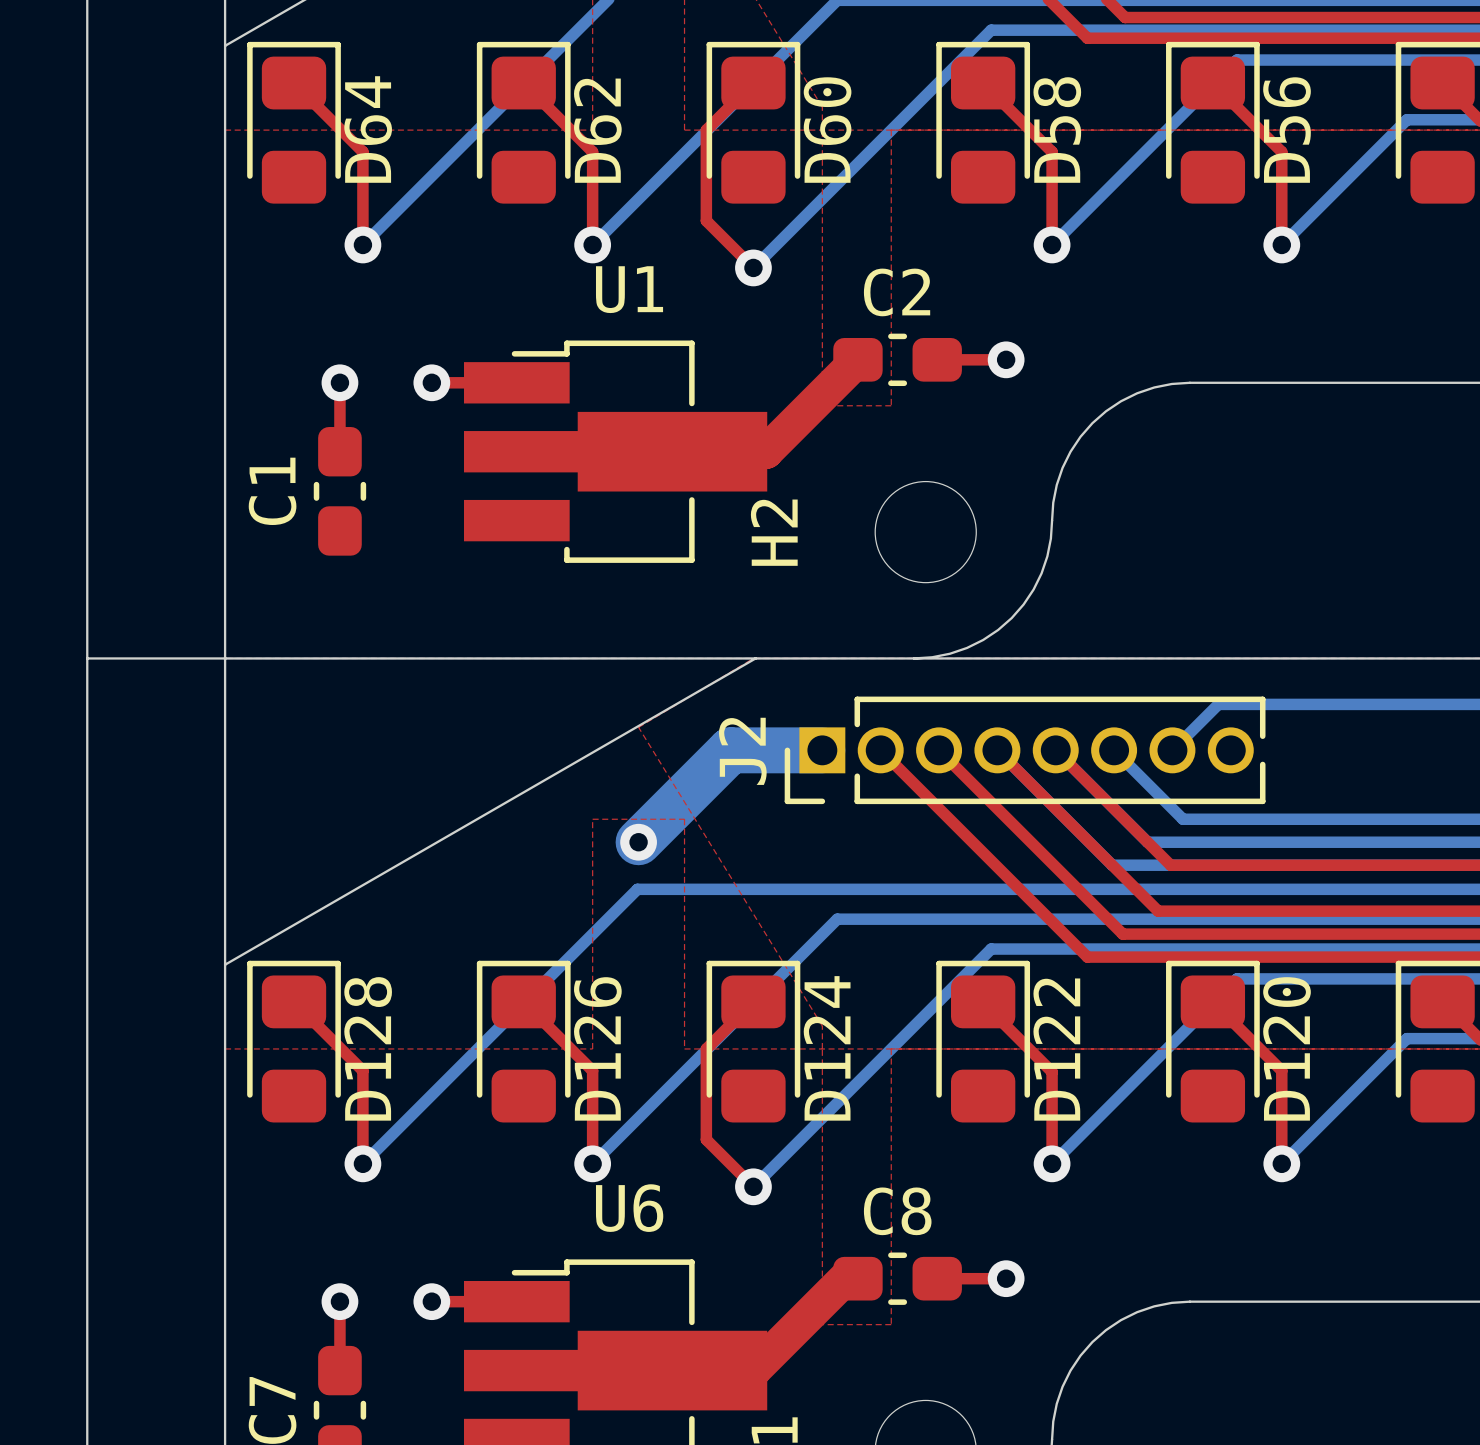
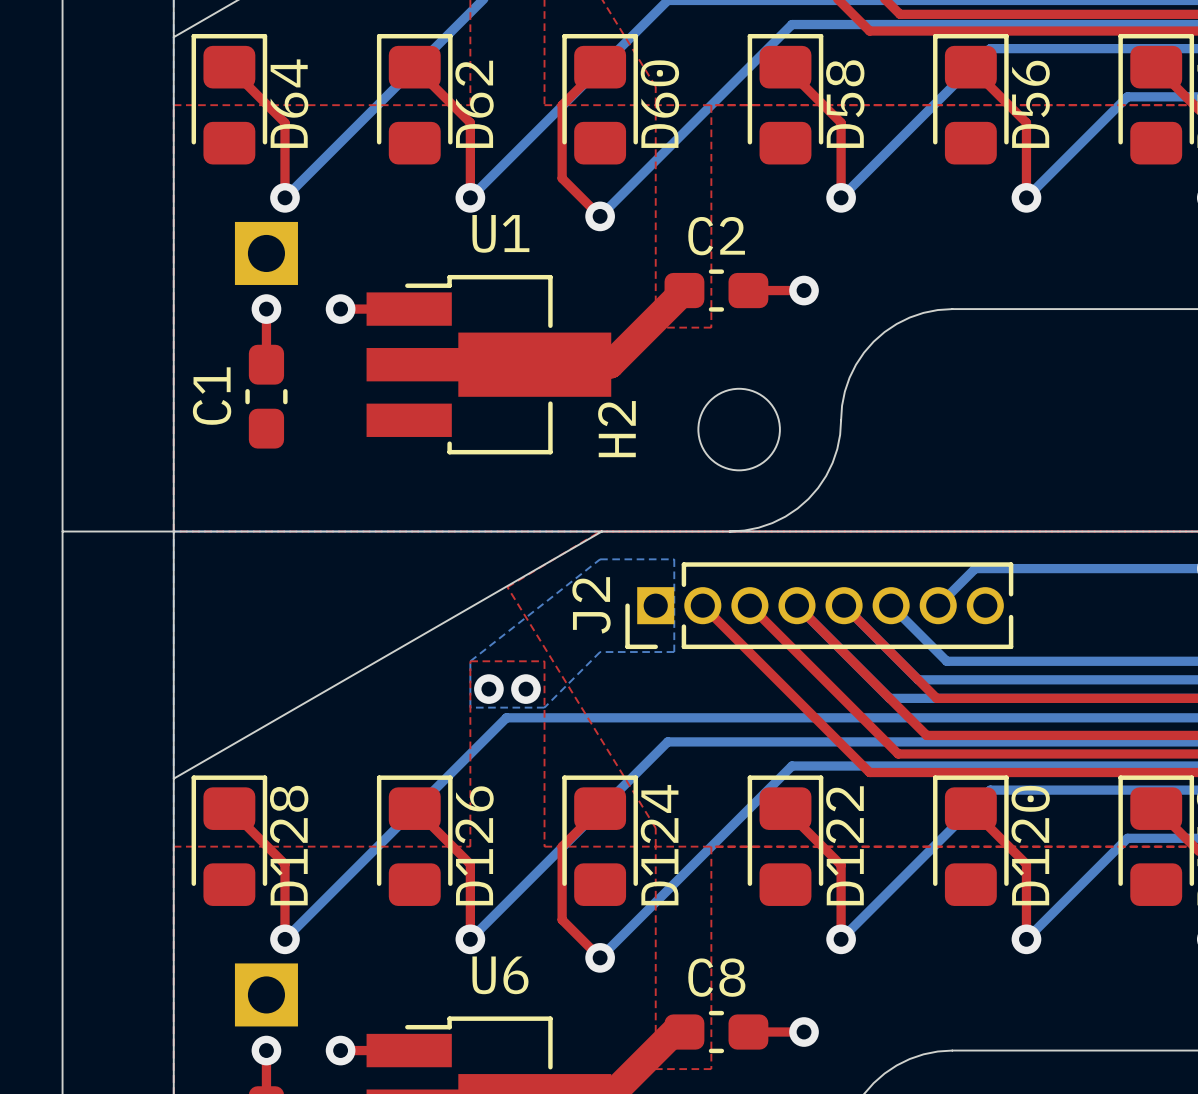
part: none -> (266, 253)
bottom zone outline: none -> (600, 559) (470, 661) (470, 707) (544, 707) (600, 652) (674, 652) (674, 559) (600, 559)
bottom track: (822, 750) (730, 750) (638, 842) -> none
via: (638, 842) -> none
via: none -> (488, 689)
via: none -> (525, 689)
part: none -> (266, 994)

